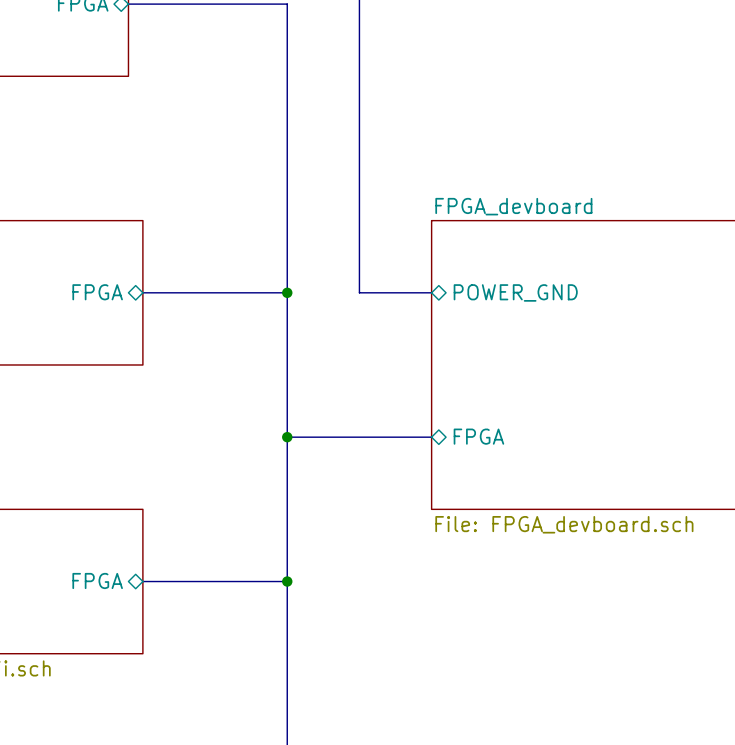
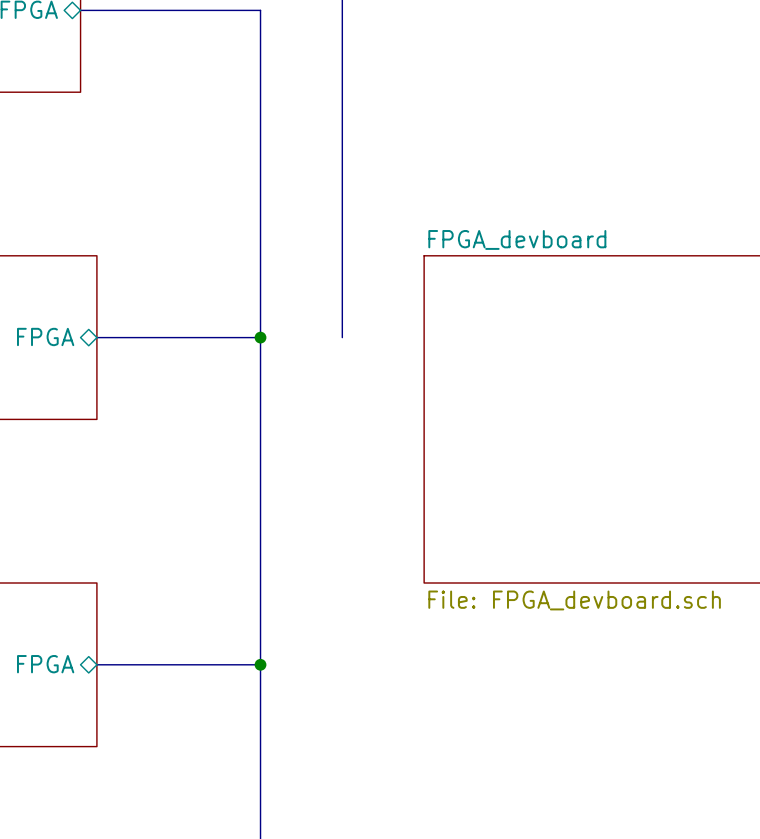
bus: (359, 292) (431, 292) -> none
sheet pin: POWER_GND (515, 292) -> none
sheet pin: FPGA (478, 436) -> none
bus: (287, 437) (431, 437) -> none
junction: (287, 437) -> none

